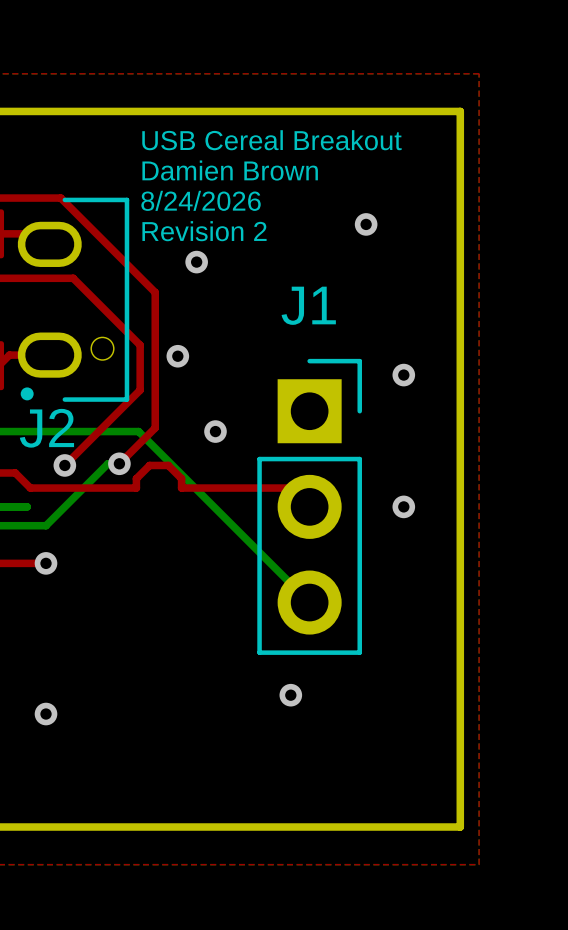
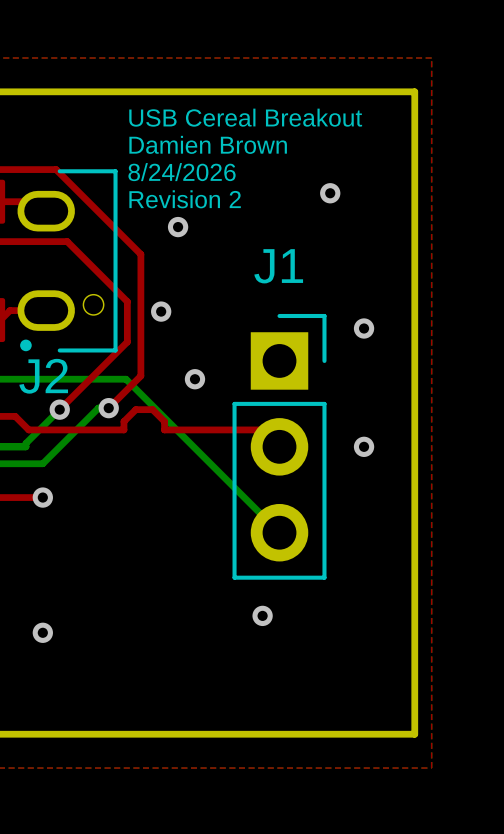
bottom track: none -> (59, 409) (25, 443) (25, 446)

